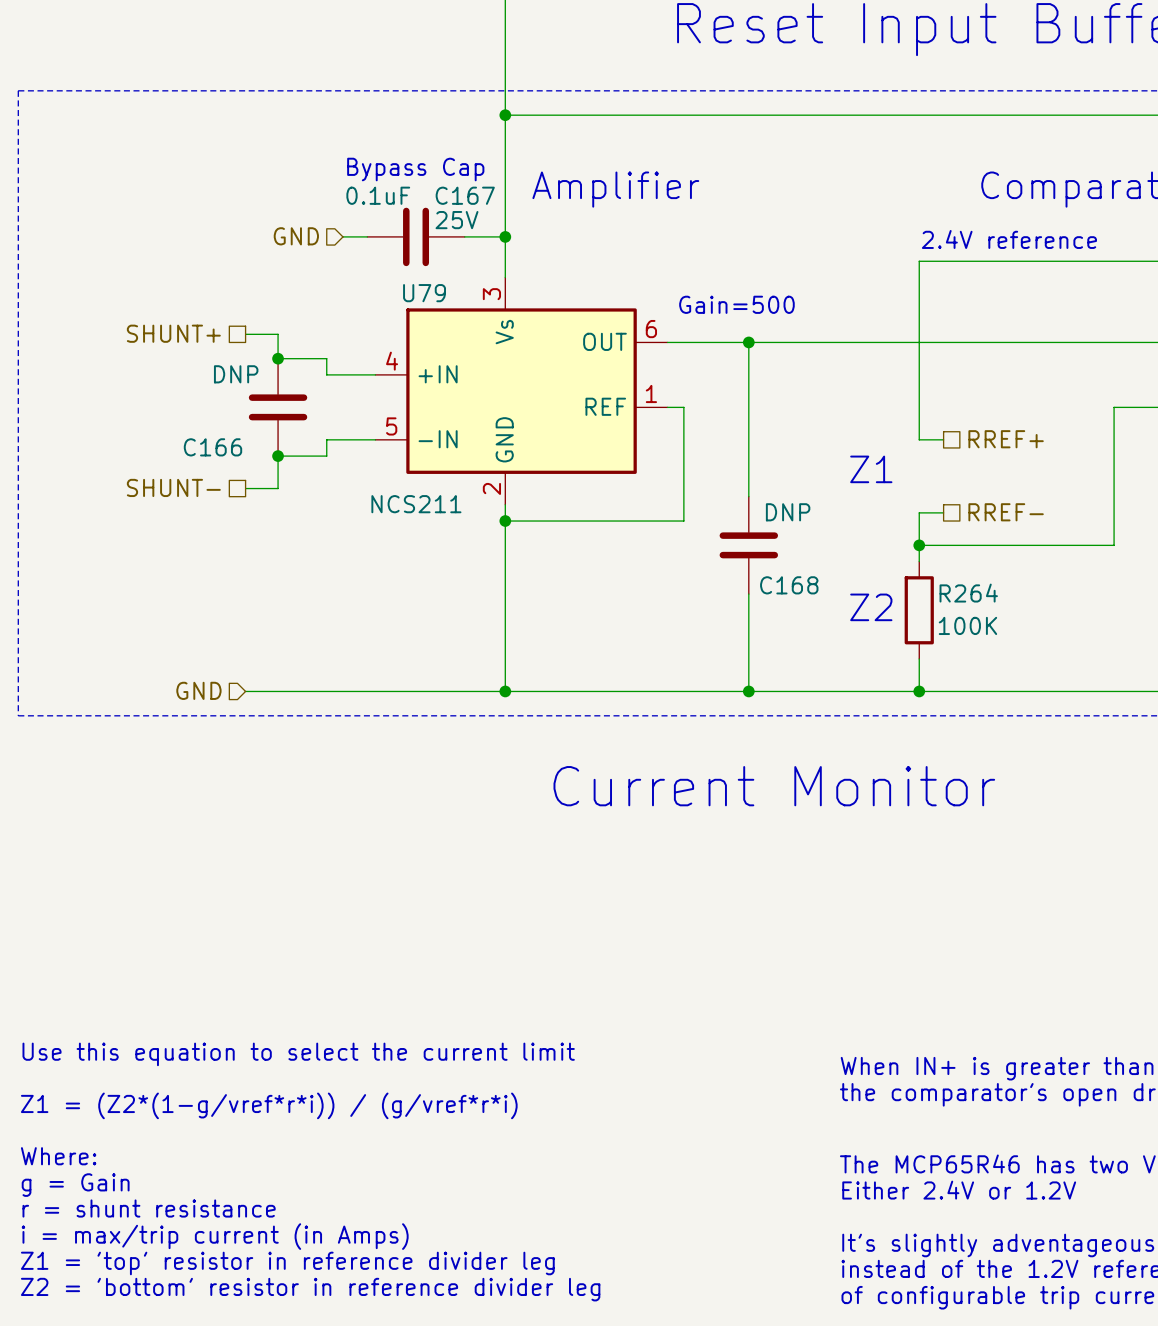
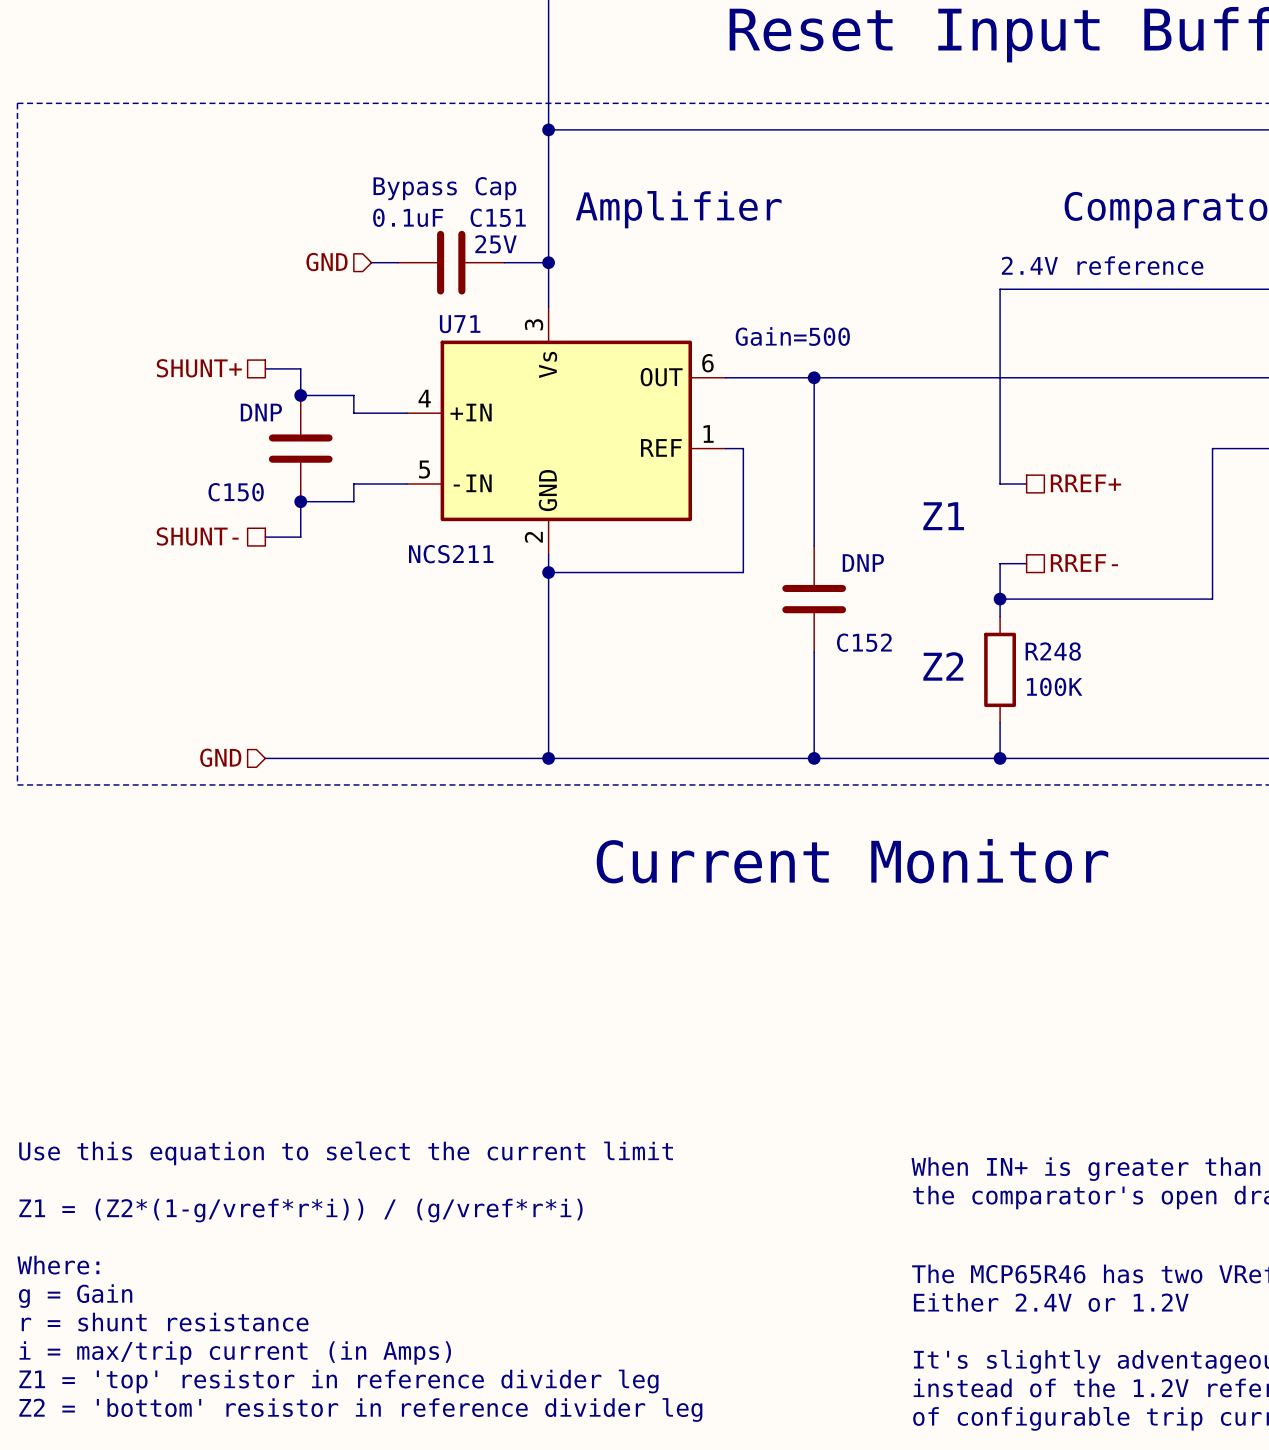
C167 name: C167 (465, 195) -> C151 (498, 217)
U79 name: U79 (424, 293) -> U71 (460, 324)
C166 name: C166 (212, 447) -> C150 (236, 492)
C168 name: C168 (789, 585) -> C152 (864, 642)
R264 name: R264 (968, 593) -> R248 (1053, 651)

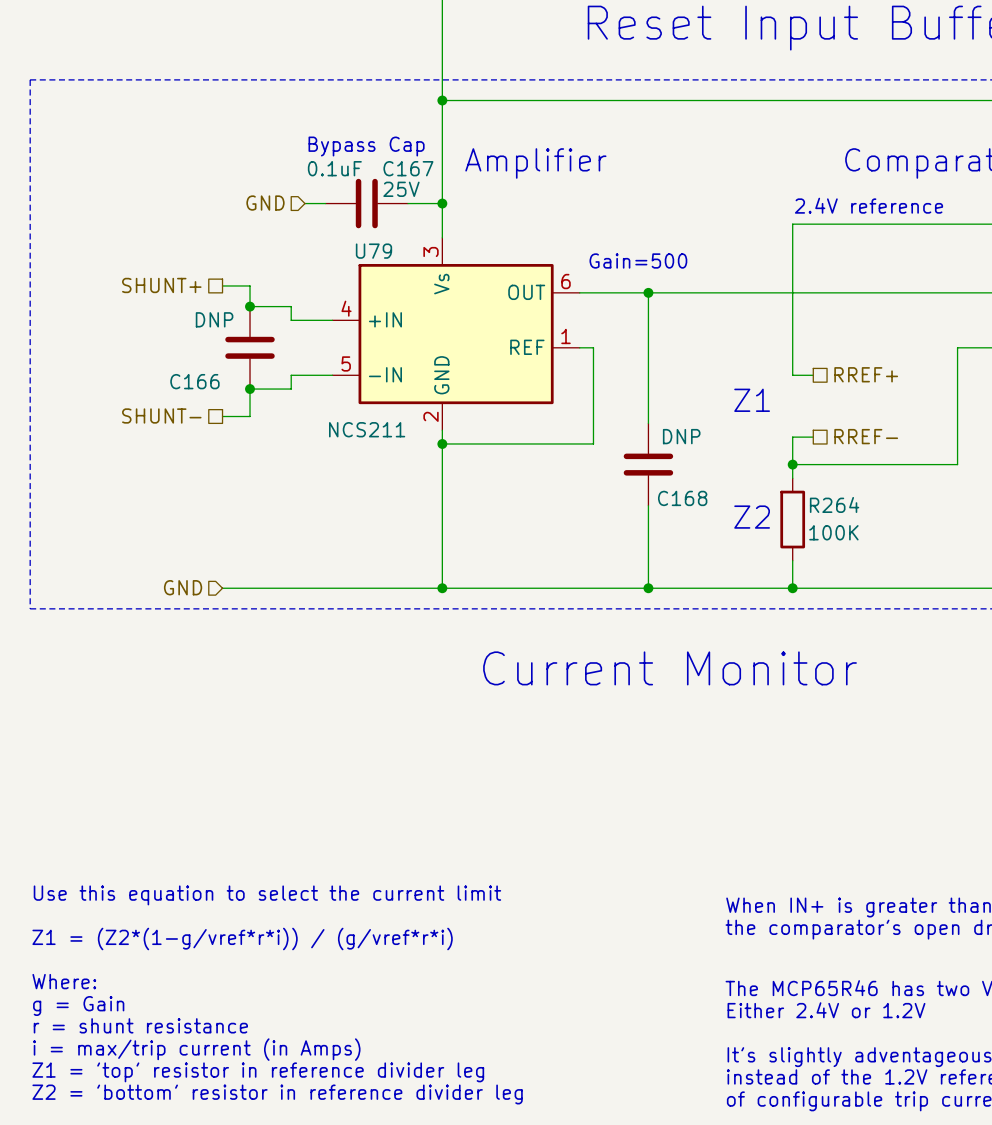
C151 name: C151 (498, 217) -> C167 (408, 168)
U71 name: U71 (460, 324) -> U79 (373, 251)
C150 name: C150 (236, 492) -> C166 (194, 381)
C152 name: C152 (864, 642) -> C168 (682, 498)
R248 name: R248 (1053, 651) -> R264 (834, 504)

